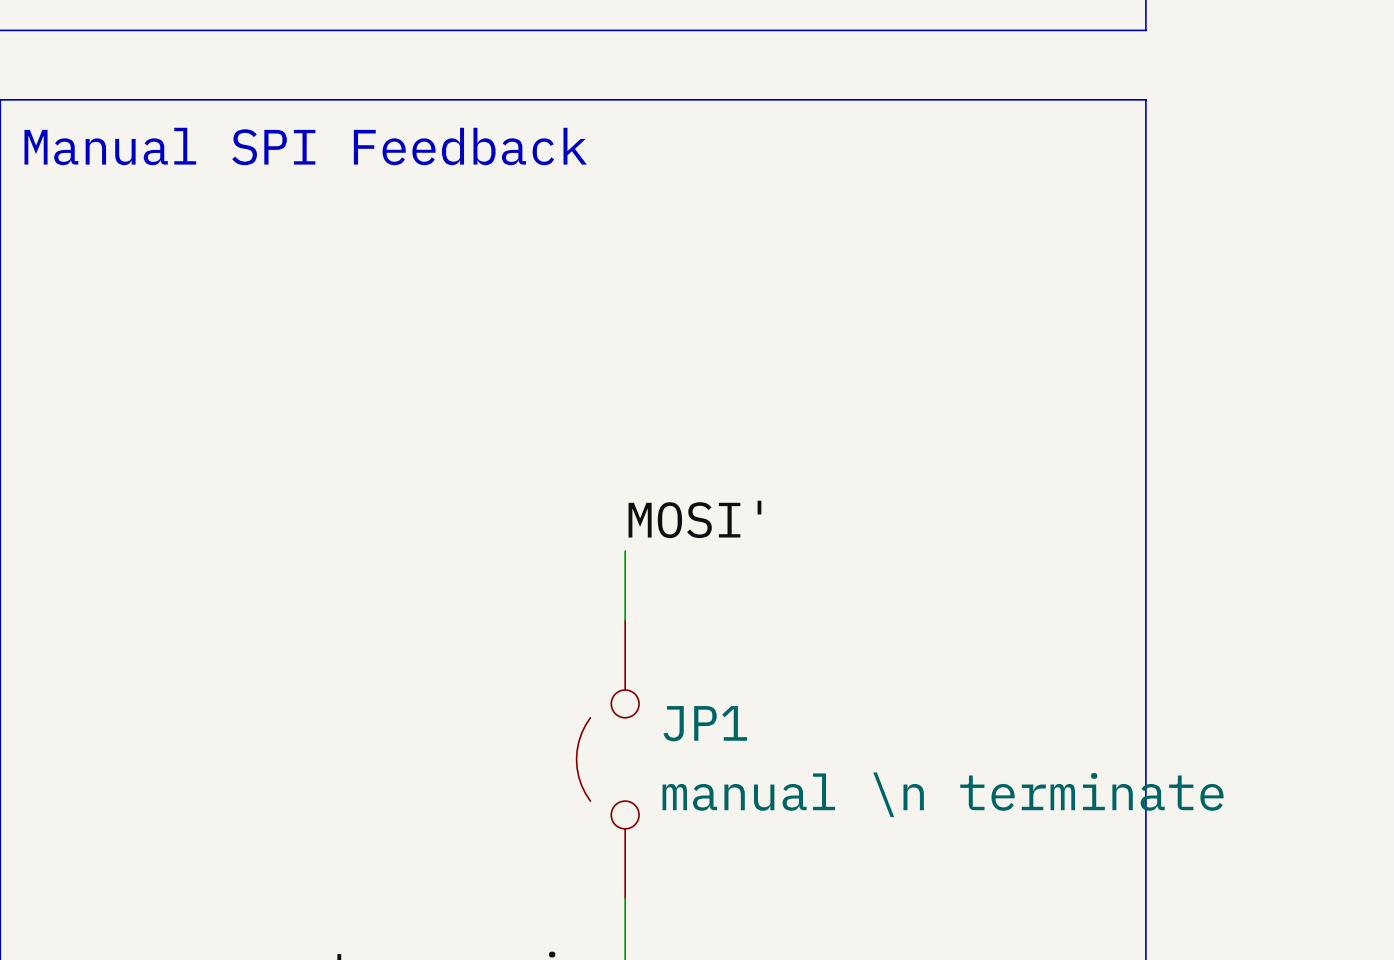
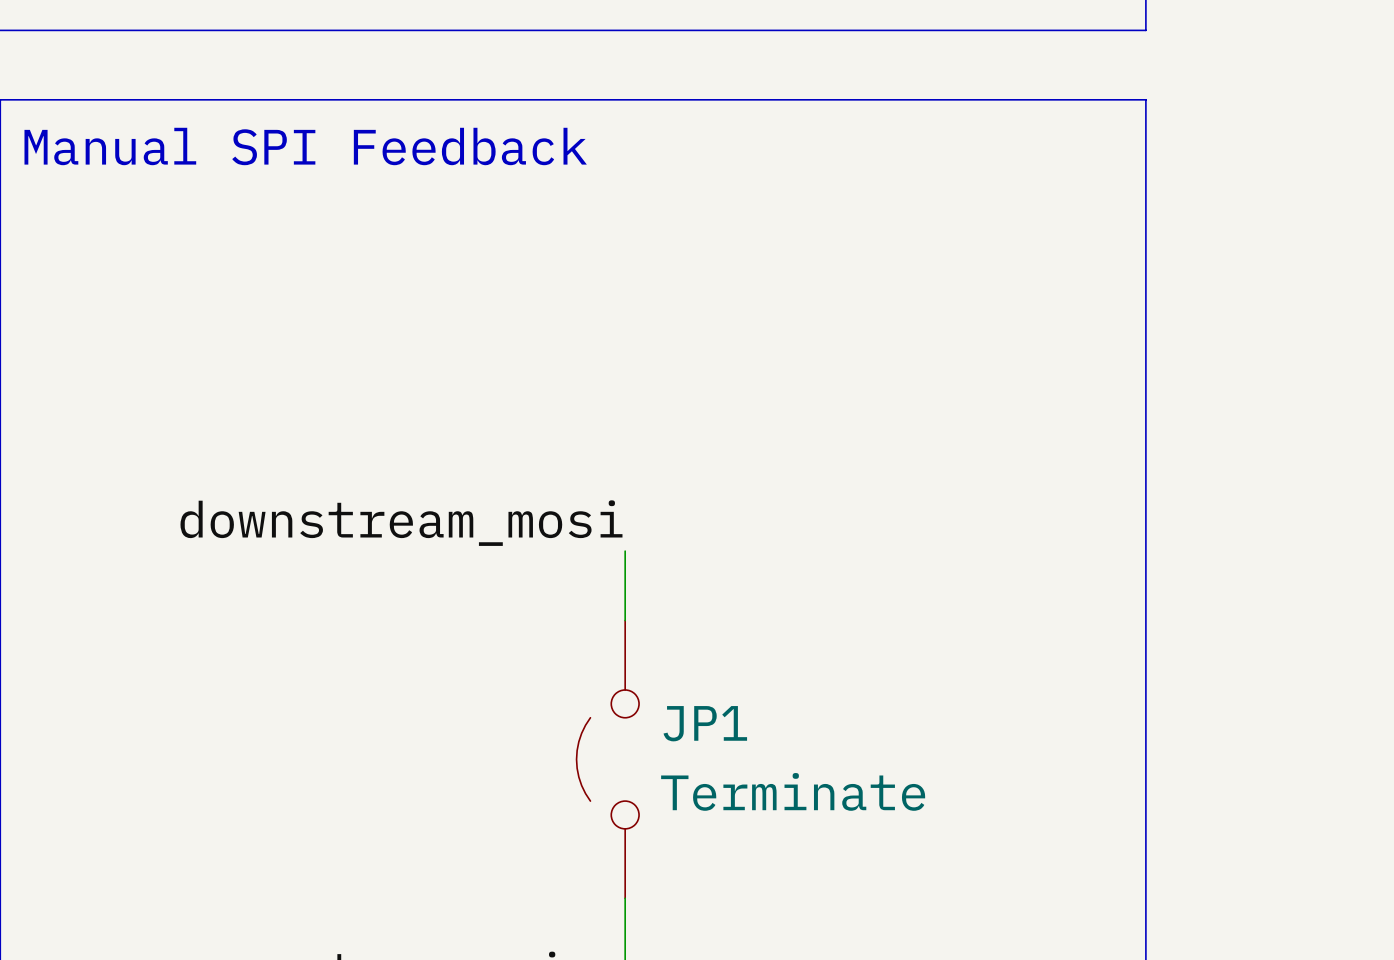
label: MOSI' (694, 519) -> downstream_mosi (401, 523)
JP1 value: manual \n terminate (943, 794) -> Terminate (793, 791)

